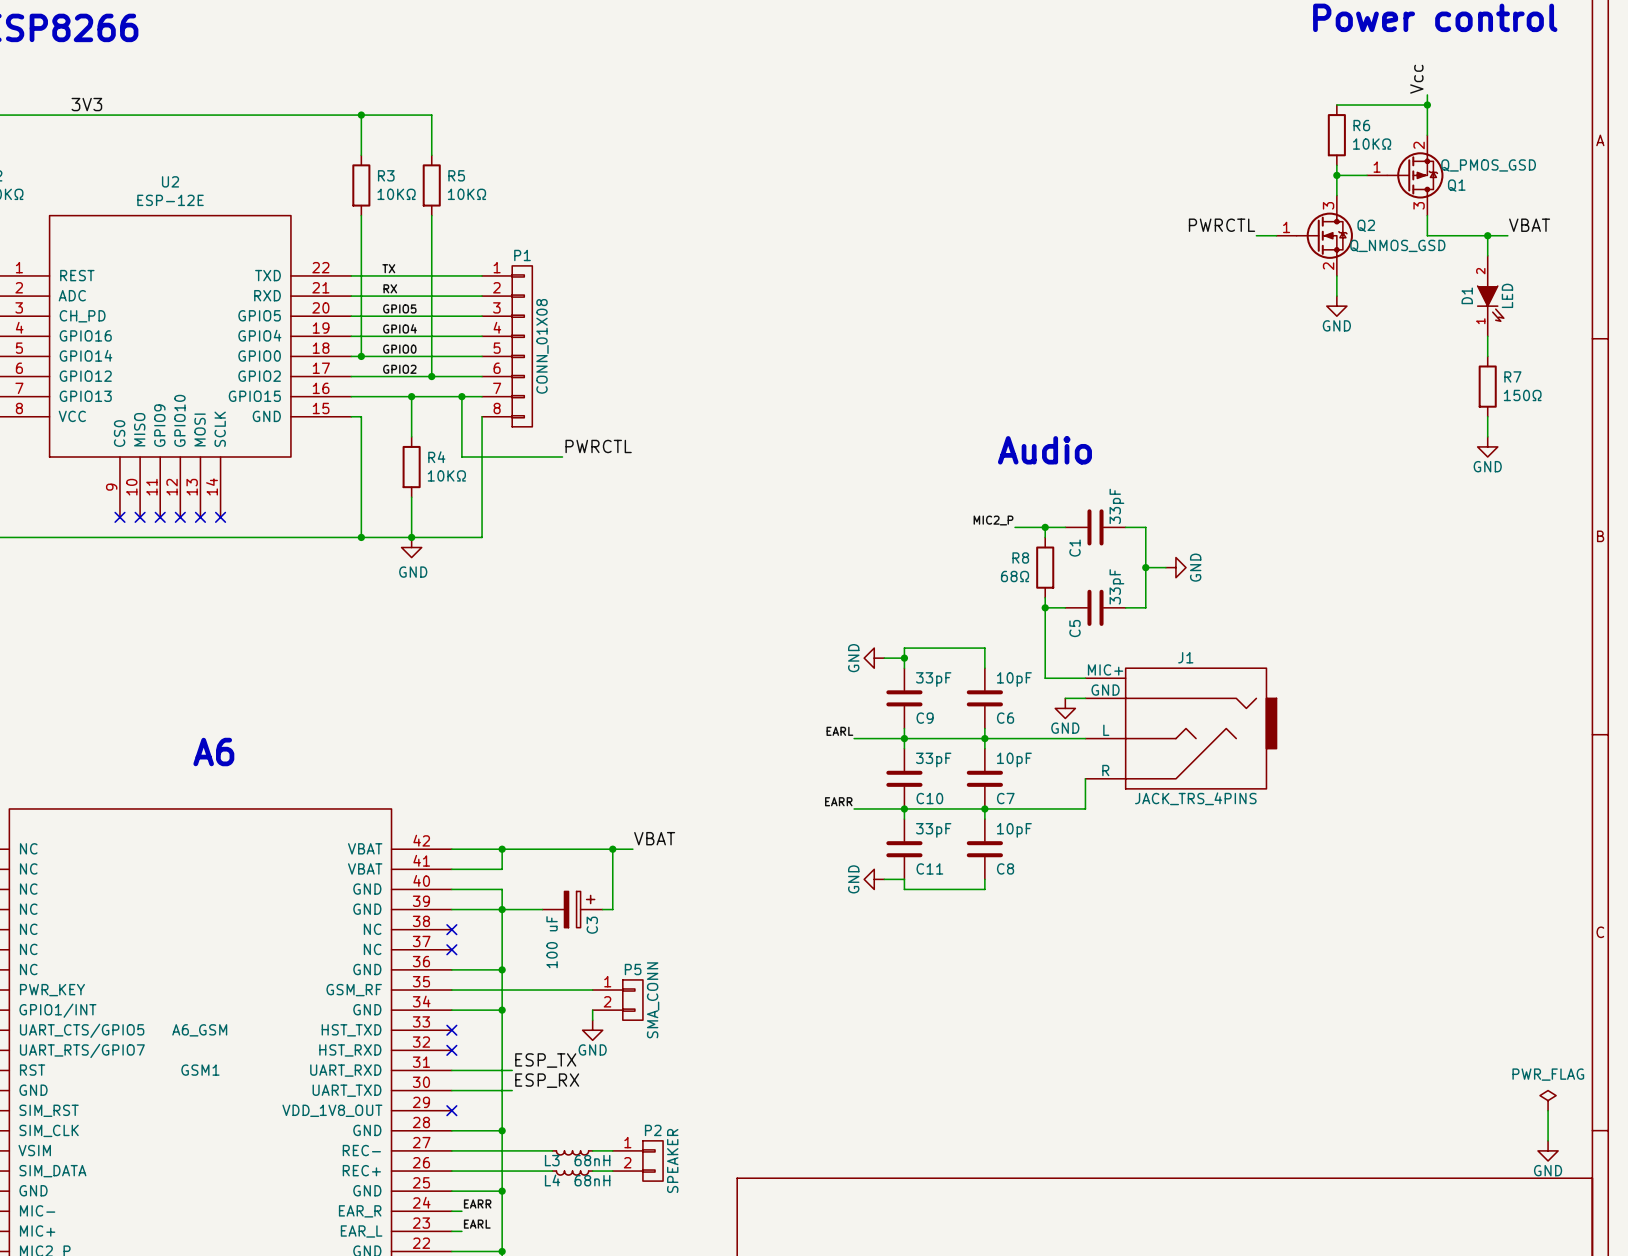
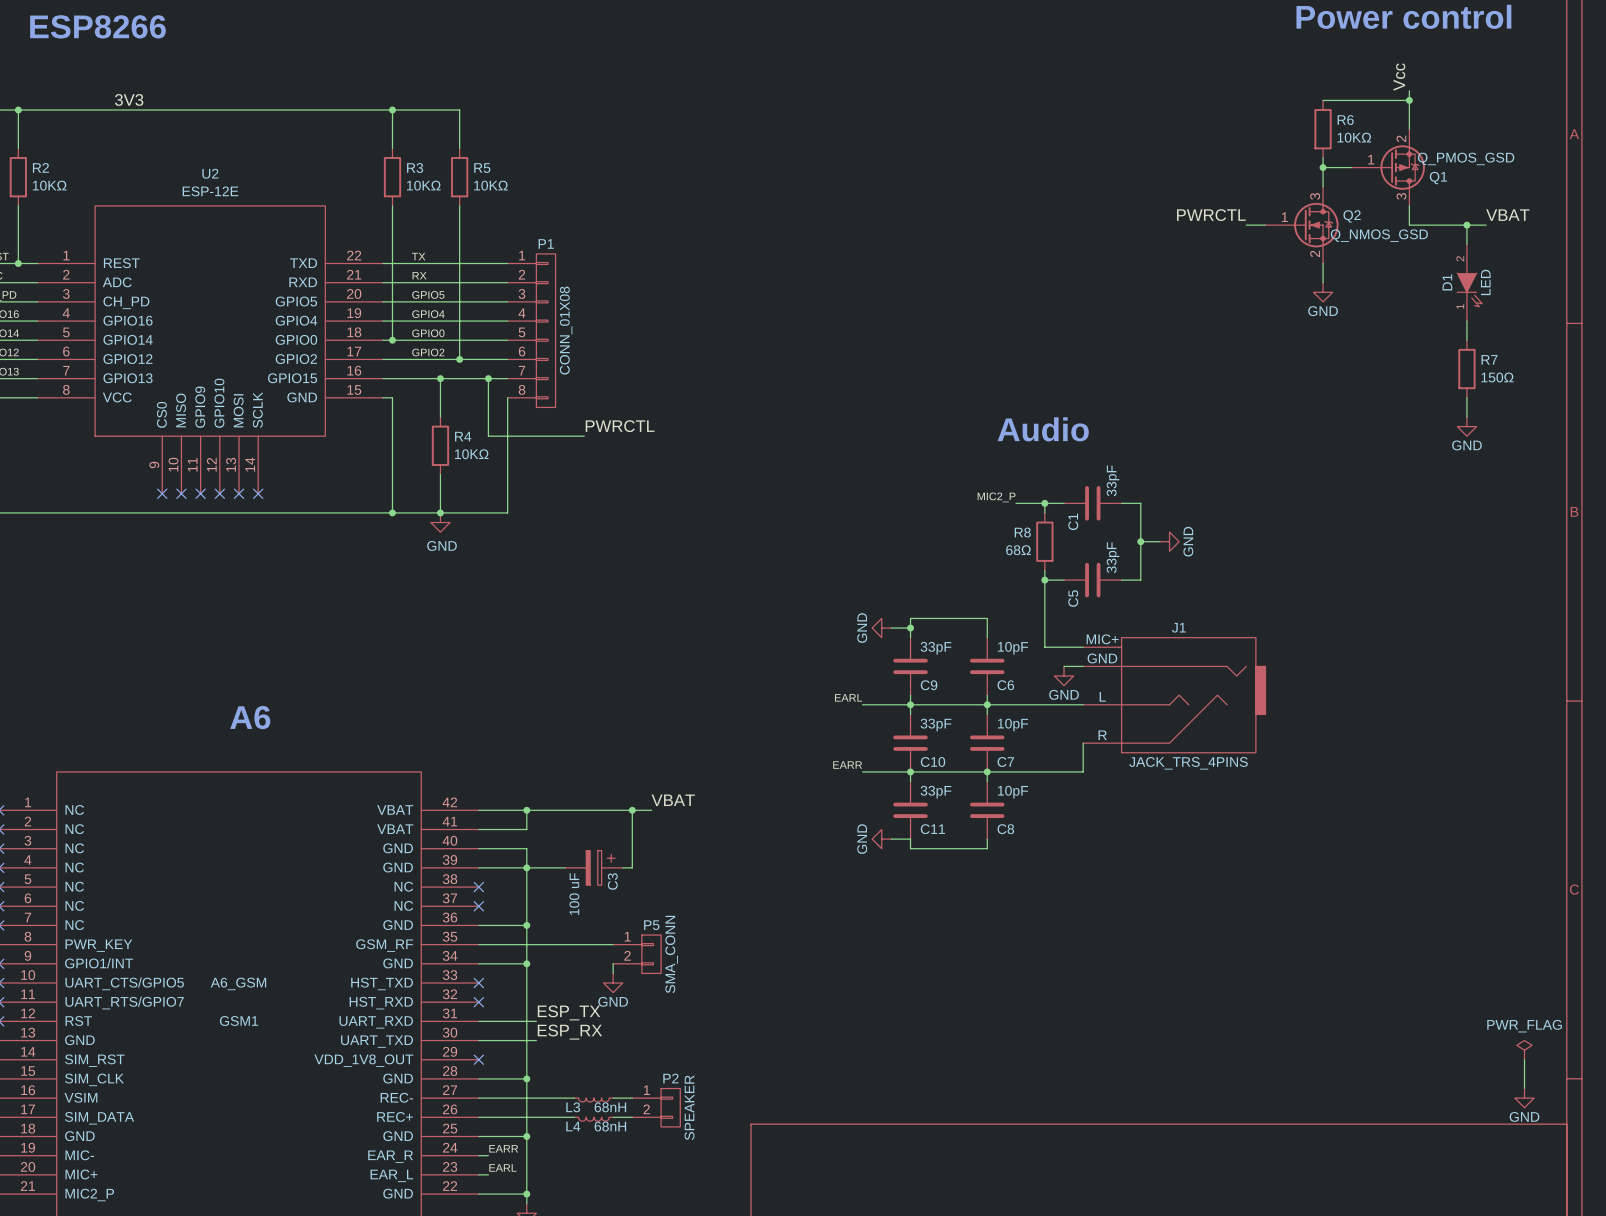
Q1 symbol: [1367, 135, 1444, 216] -> [1351, 129, 1425, 206]
Q2 symbol: [1276, 195, 1353, 276] -> [1265, 186, 1339, 264]

